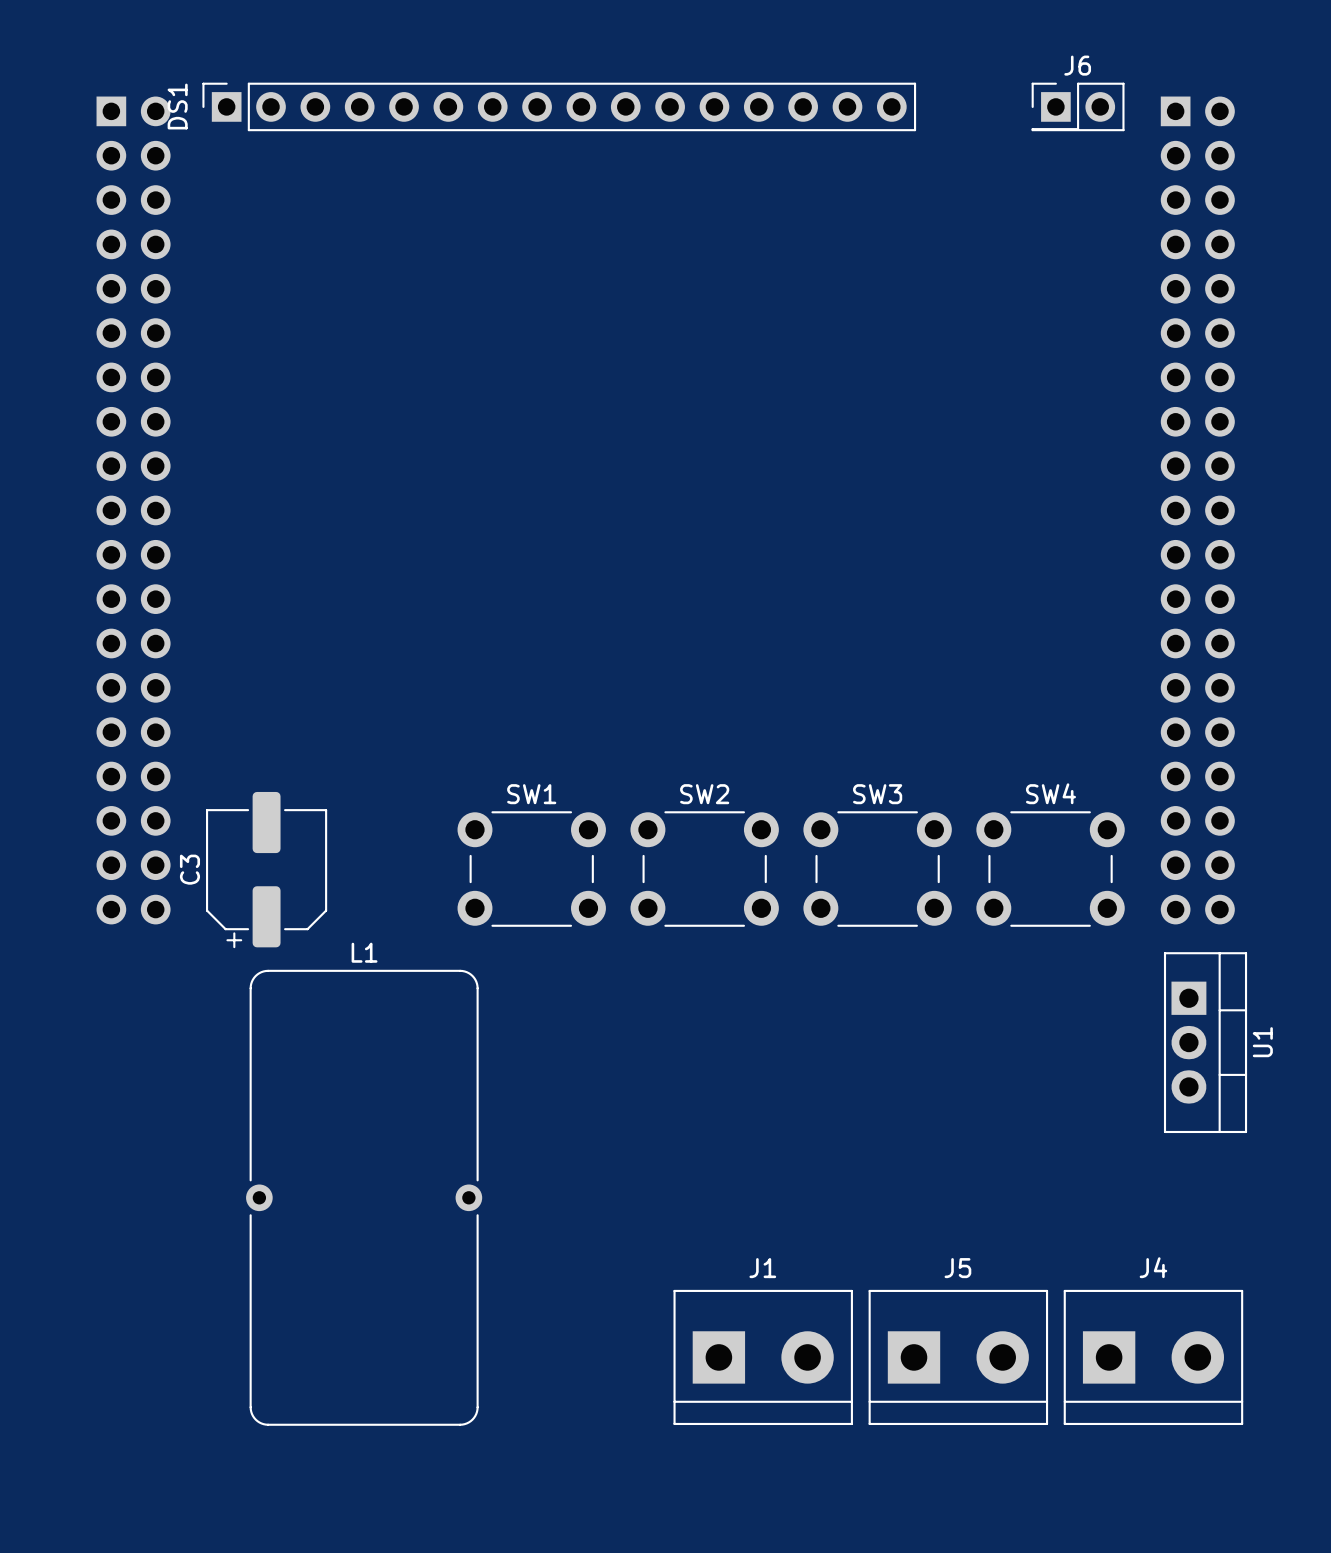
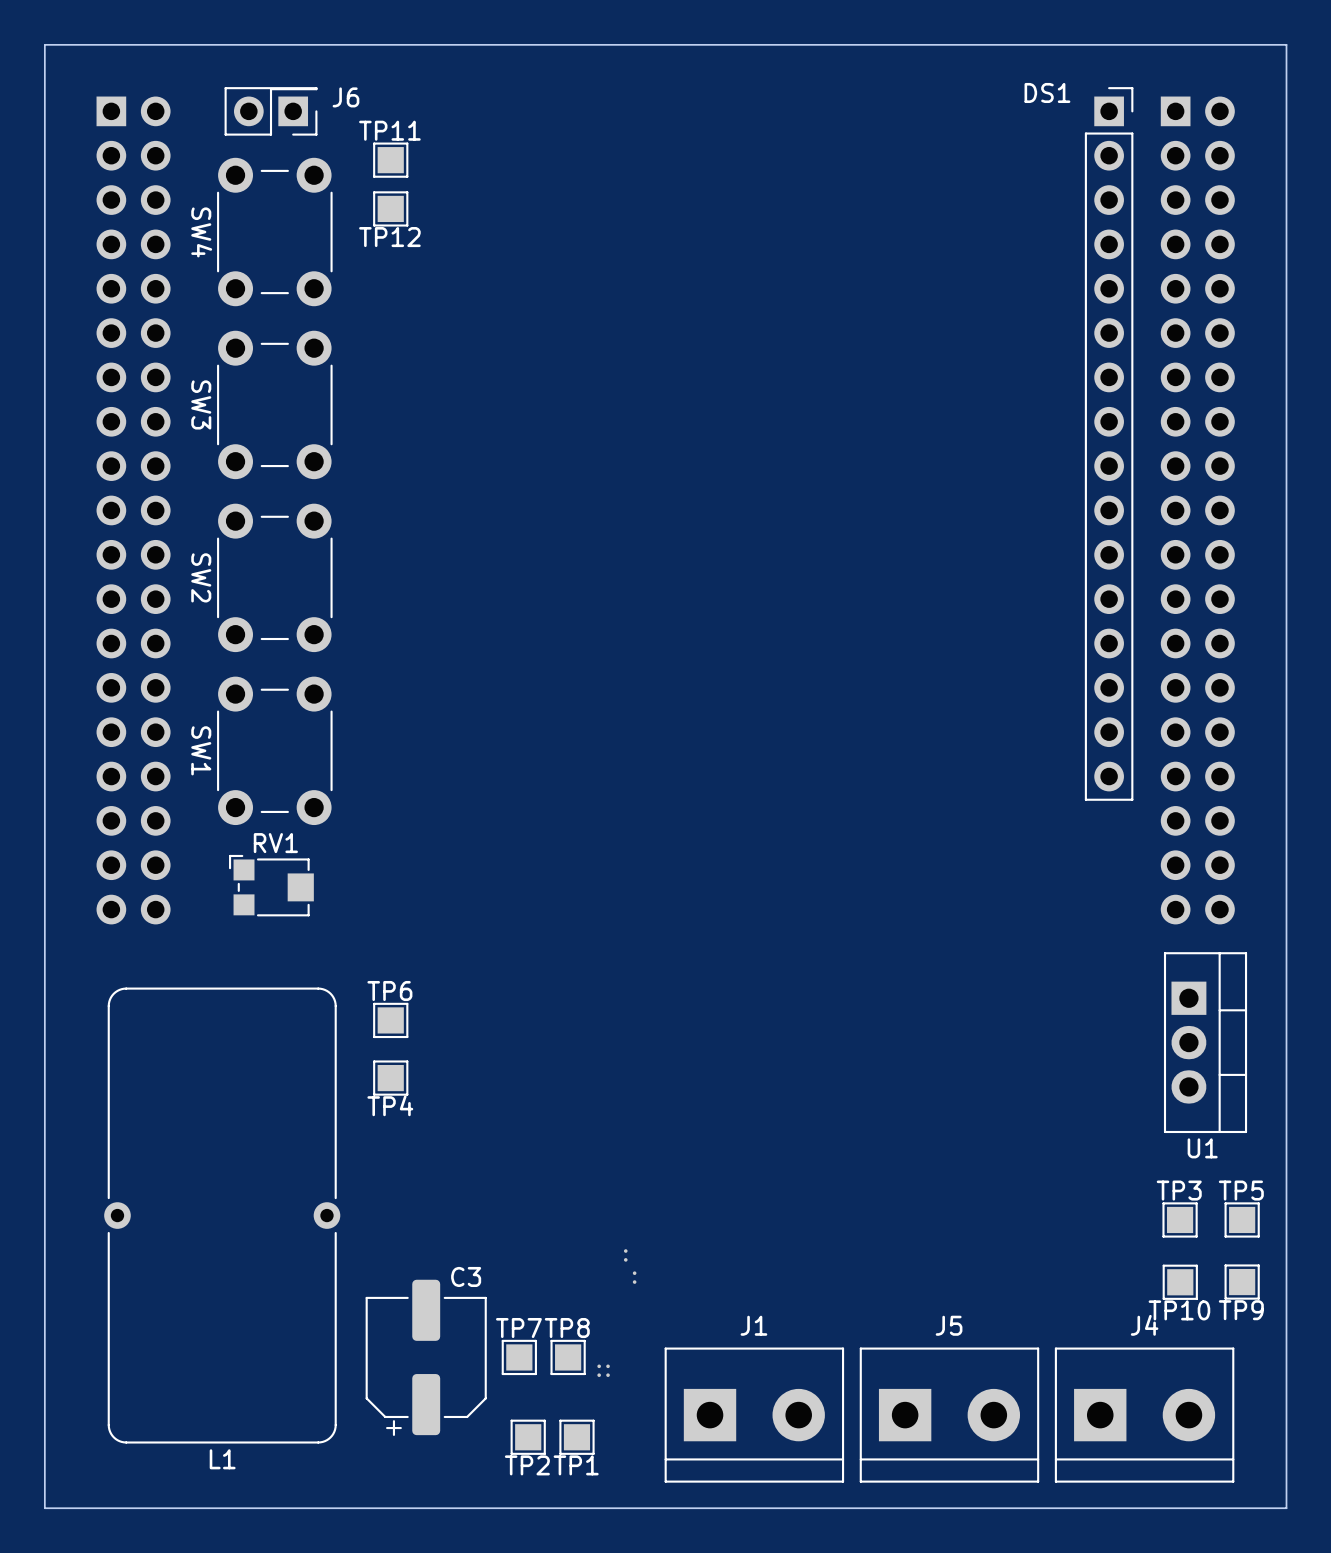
board edge: none -> (44, 44) (44, 1508) (1286, 1508) (1286, 44) (44, 44)
J6 name position: J6 (1077, 65) -> J6 (345, 97)
DS1 name position: DS1 (177, 106) -> DS1 (1047, 92)
DS1 rotation: 0° (559, 106) -> 90° clockwise (1109, 443)
DS1 position: (559, 106) -> (1109, 443)
J6 rotation: 0° (1078, 106) -> 180° (271, 111)
J6 position: (1078, 106) -> (271, 111)
TP11: none -> (390, 160)
TP12: none -> (390, 208)
SW4 name position: SW4 (1050, 793) -> SW4 (201, 232)
SW1 name position: SW1 (531, 794) -> SW1 (201, 750)
SW2 name position: SW2 (704, 794) -> SW2 (201, 577)
SW3 name position: SW3 (877, 794) -> SW3 (201, 404)
C3 name rotation: 0° (189, 869) -> 90° clockwise (466, 1276)
C3 name position: C3 (189, 869) -> C3 (466, 1276)
SW1 rotation: 0° (531, 869) -> 90° clockwise (274, 750)
SW1 position: (531, 869) -> (274, 750)
SW2 rotation: 0° (704, 869) -> 90° clockwise (274, 577)
SW2 position: (704, 869) -> (274, 577)
SW3 rotation: 0° (877, 869) -> 90° clockwise (274, 404)
SW3 position: (877, 869) -> (274, 404)
SW4 rotation: 0° (1050, 869) -> 90° clockwise (274, 232)
SW4 position: (1050, 869) -> (274, 232)
C3 position: (266, 870) -> (426, 1357)
RV1: none -> (271, 885)
L1 name position: L1 (364, 952) -> L1 (222, 1459)
TP6: none -> (390, 1020)
U1 name rotation: 0° (1262, 1042) -> 90° clockwise (1202, 1148)
U1 name position: U1 (1262, 1042) -> U1 (1202, 1148)
TP4: none -> (390, 1078)
L1 position: (364, 1197) -> (222, 1215)
TP3: none -> (1180, 1219)
TP5: none -> (1242, 1219)
part: none -> (625, 1255)
part: none -> (634, 1277)
TP10: none -> (1180, 1282)
TP9: none -> (1242, 1282)
TP7: none -> (519, 1357)
TP8: none -> (568, 1357)
J1 position: (763, 1357) -> (754, 1415)
J5 position: (958, 1357) -> (949, 1415)
J4 position: (1153, 1357) -> (1144, 1415)
part: none -> (599, 1370)
part: none -> (608, 1370)
TP2: none -> (528, 1437)
TP1: none -> (576, 1437)

